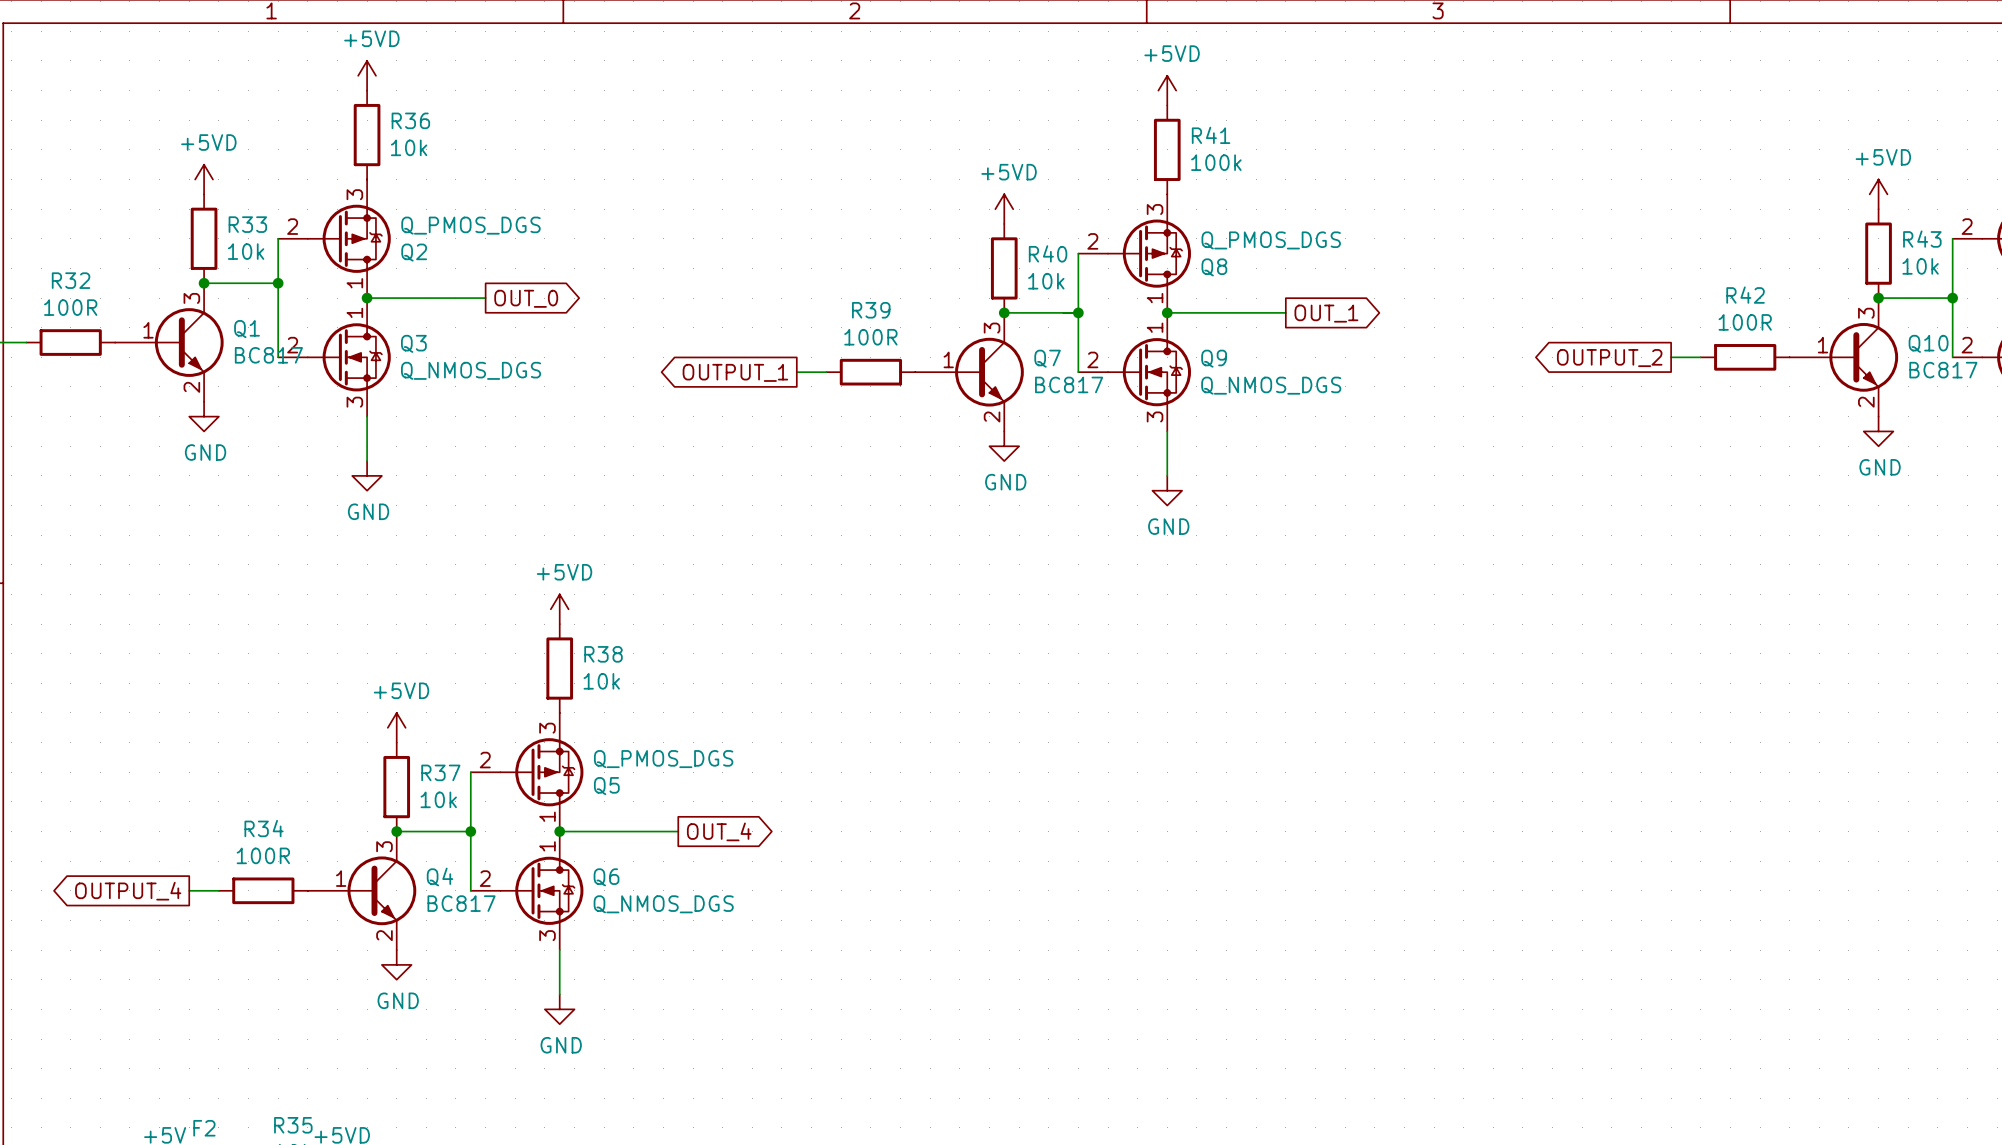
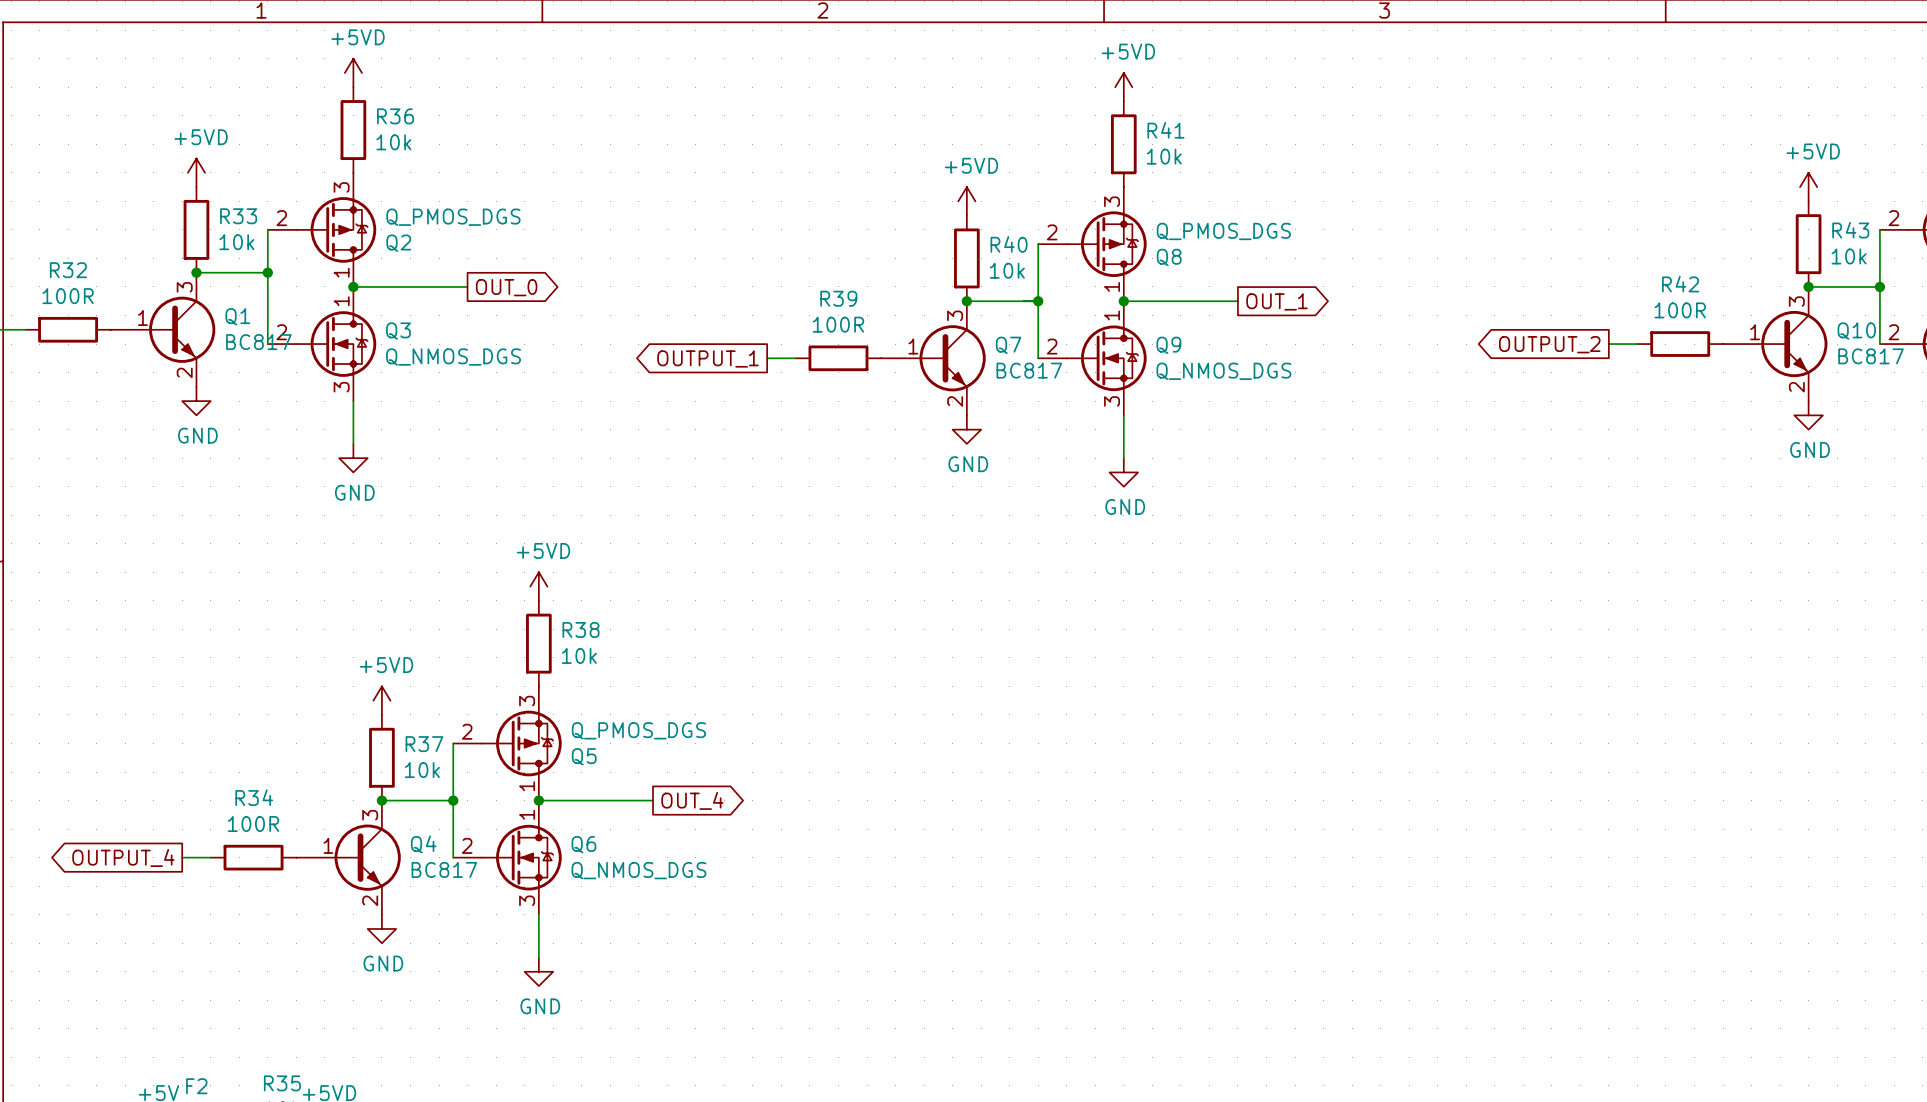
R41 value: 100k (1216, 162) -> 10k (1164, 156)

